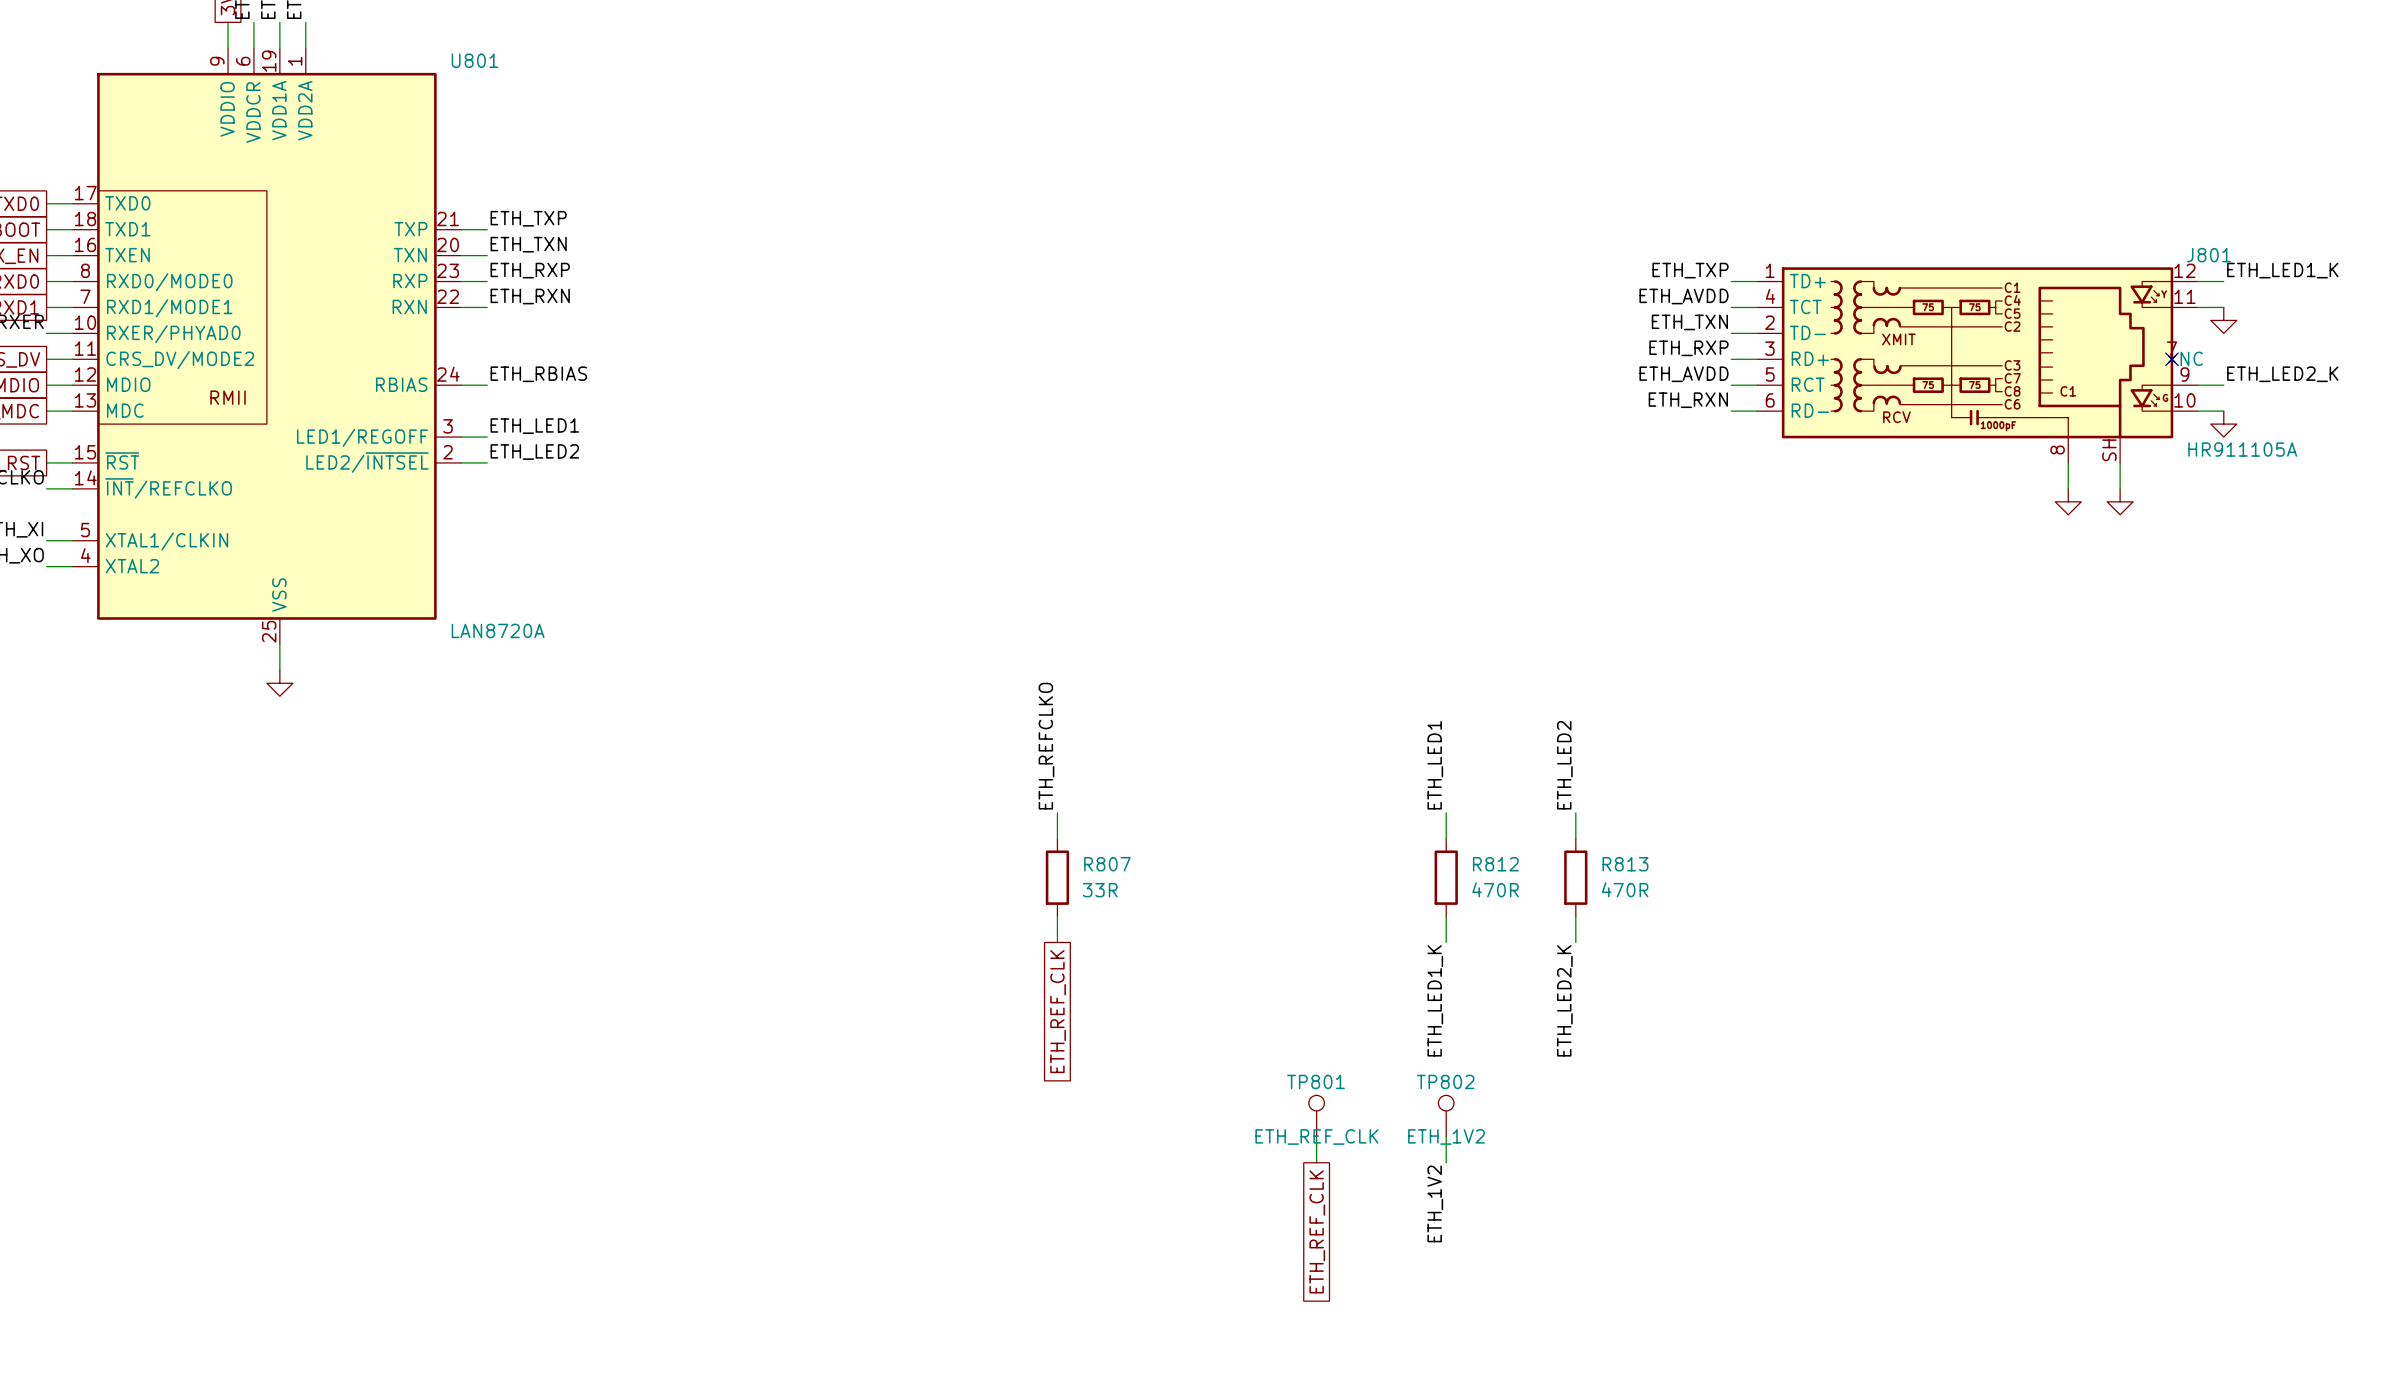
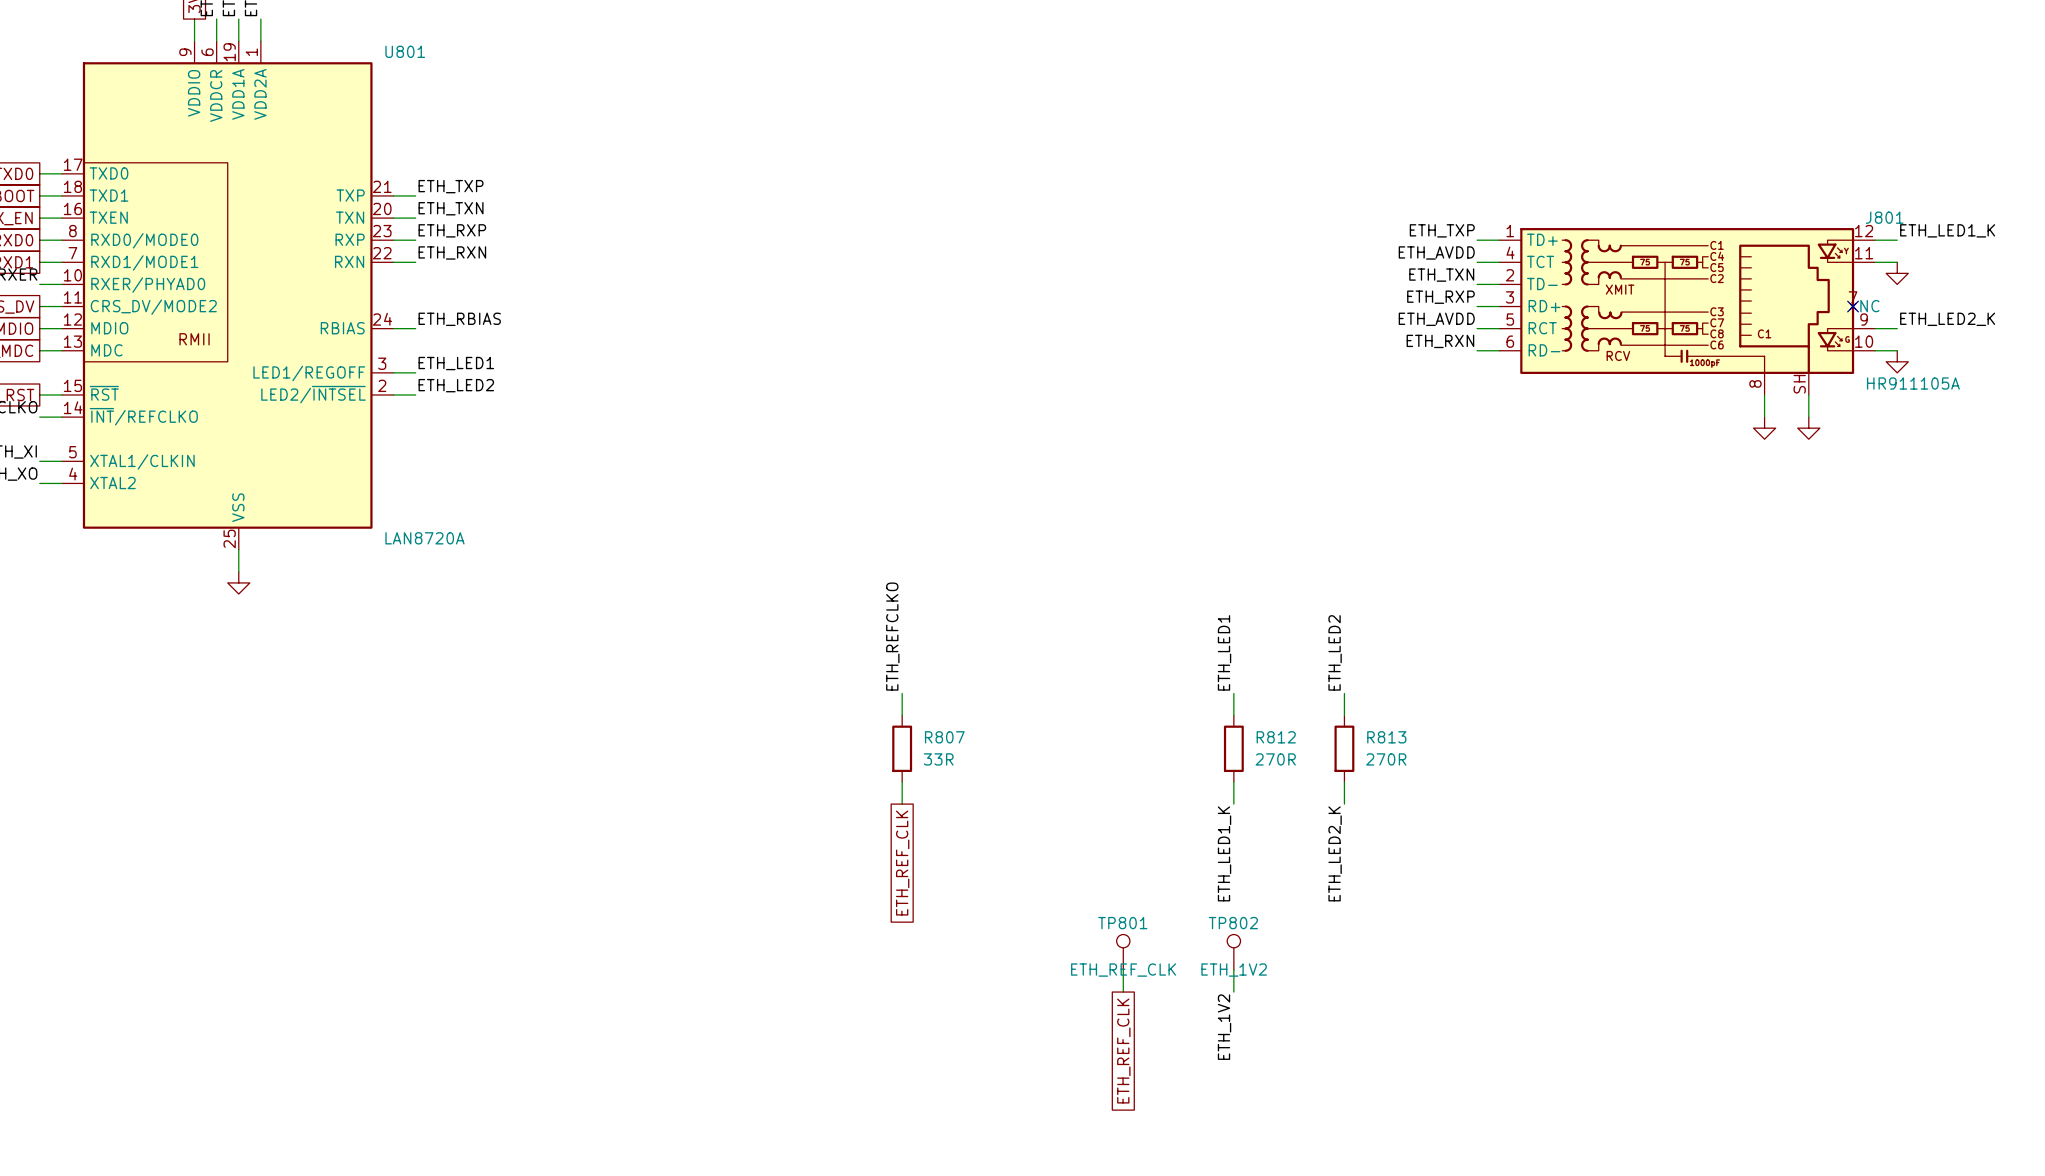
R812 value: 470R (1495, 889) -> 270R (1275, 759)
R813 value: 470R (1625, 889) -> 270R (1386, 759)

